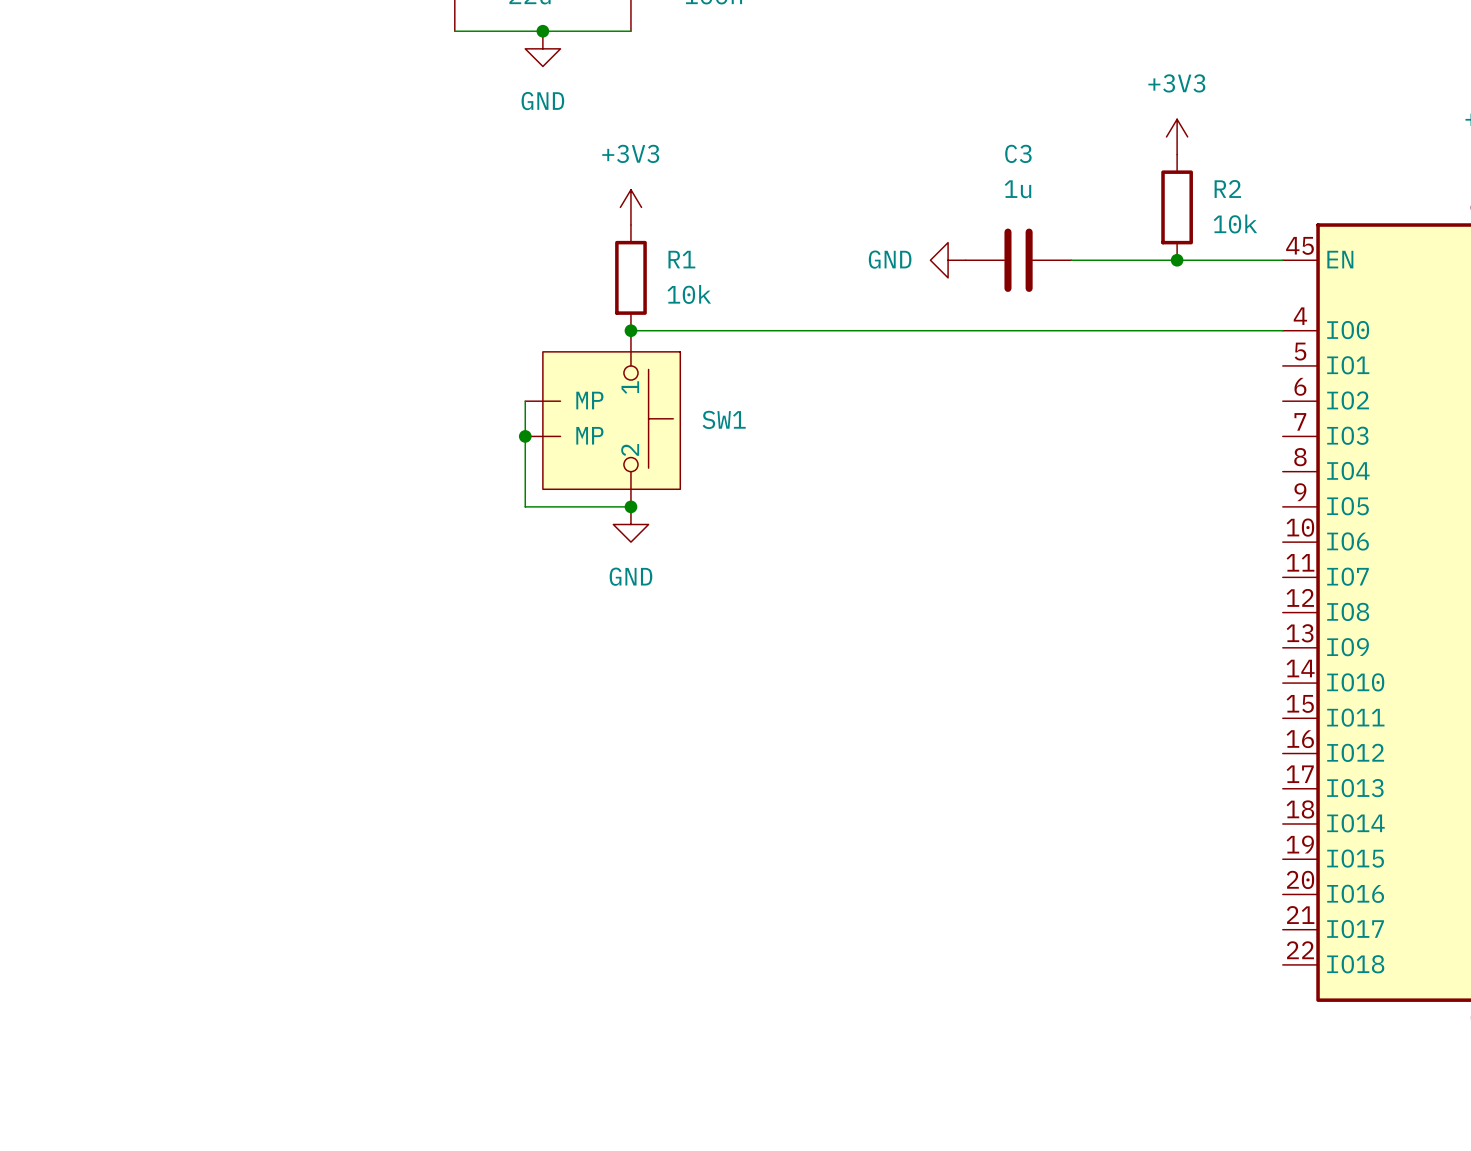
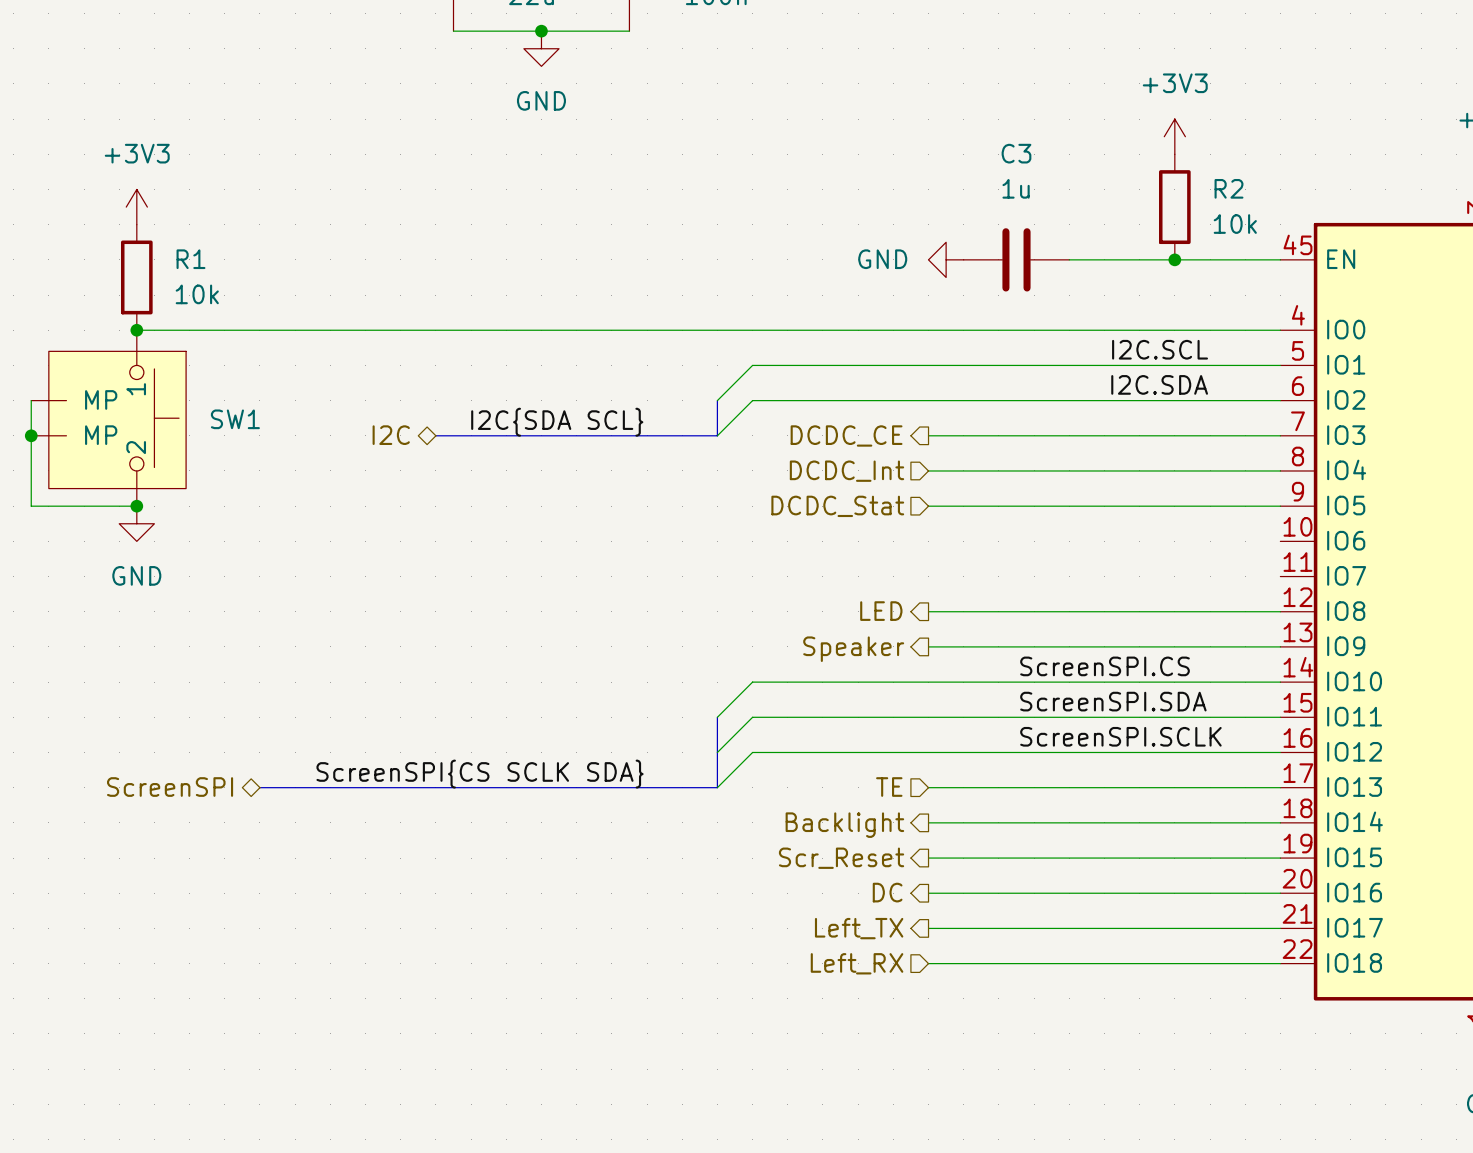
power symbol: none -> +3V3 (136, 207)
power symbol: +3V3 (630, 207) -> none
R1 position: (630, 277) -> (136, 277)
wire: none -> (136, 330) (629, 330)
junction: none -> (136, 330)
junction: (630, 330) -> none
label: none -> I2C.SCL (1160, 349)
wire: none -> (1280, 365) (752, 365) (717, 400)
label: none -> I2C.SDA (1159, 384)
wire: none -> (31, 400) (31, 506) (136, 506)
wire: (525, 401) (525, 506) (630, 506) -> none
bus: none -> (717, 400) (717, 435) (435, 435)
wire: none -> (1280, 400) (752, 400) (717, 435)
SW1 position: (602, 418) -> (108, 418)
label: none -> I2C{SDA SCL} (557, 422)
hierarchical label: none -> I2C (391, 435)
junction: none -> (31, 435)
junction: (525, 436) -> none
wire: none -> (928, 435) (1280, 435)
hierarchical label: none -> DCDC_CE (846, 435)
wire: none -> (928, 470) (1280, 470)
hierarchical label: none -> DCDC_Int (846, 471)
junction: none -> (136, 506)
junction: (630, 506) -> none
wire: none -> (928, 506) (1280, 506)
hierarchical label: none -> DCDC_Stat (837, 506)
power symbol: none -> GND (136, 523)
power symbol: GND (630, 524) -> none
hierarchical label: none -> LED (881, 611)
wire: none -> (928, 611) (1280, 611)
wire: none -> (928, 646) (1280, 646)
hierarchical label: none -> Speaker (853, 649)
label: none -> ScreenSPI.CS (1105, 666)
wire: none -> (1280, 682) (752, 682) (717, 717)
label: none -> ScreenSPI.SDA (1113, 701)
bus: none -> (717, 717) (717, 787) (259, 787)
wire: none -> (1280, 717) (752, 717) (717, 752)
label: none -> ScreenSPI.SCLK (1120, 736)
wire: none -> (1280, 752) (752, 752) (717, 787)
label: none -> ScreenSPI{CS SCLK SDA} (480, 774)
hierarchical label: none -> ScreenSPI (170, 787)
hierarchical label: none -> TE (889, 787)
wire: none -> (928, 787) (1280, 787)
wire: none -> (928, 822) (1280, 822)
hierarchical label: none -> Backlight (844, 825)
wire: none -> (928, 858) (1280, 858)
hierarchical label: none -> Scr_Reset (841, 858)
hierarchical label: none -> DC (887, 892)
wire: none -> (928, 893) (1280, 893)
wire: none -> (928, 928) (1280, 928)
hierarchical label: none -> Left_TX (859, 928)
wire: none -> (928, 963) (1280, 963)
hierarchical label: none -> Left_RX (857, 963)

